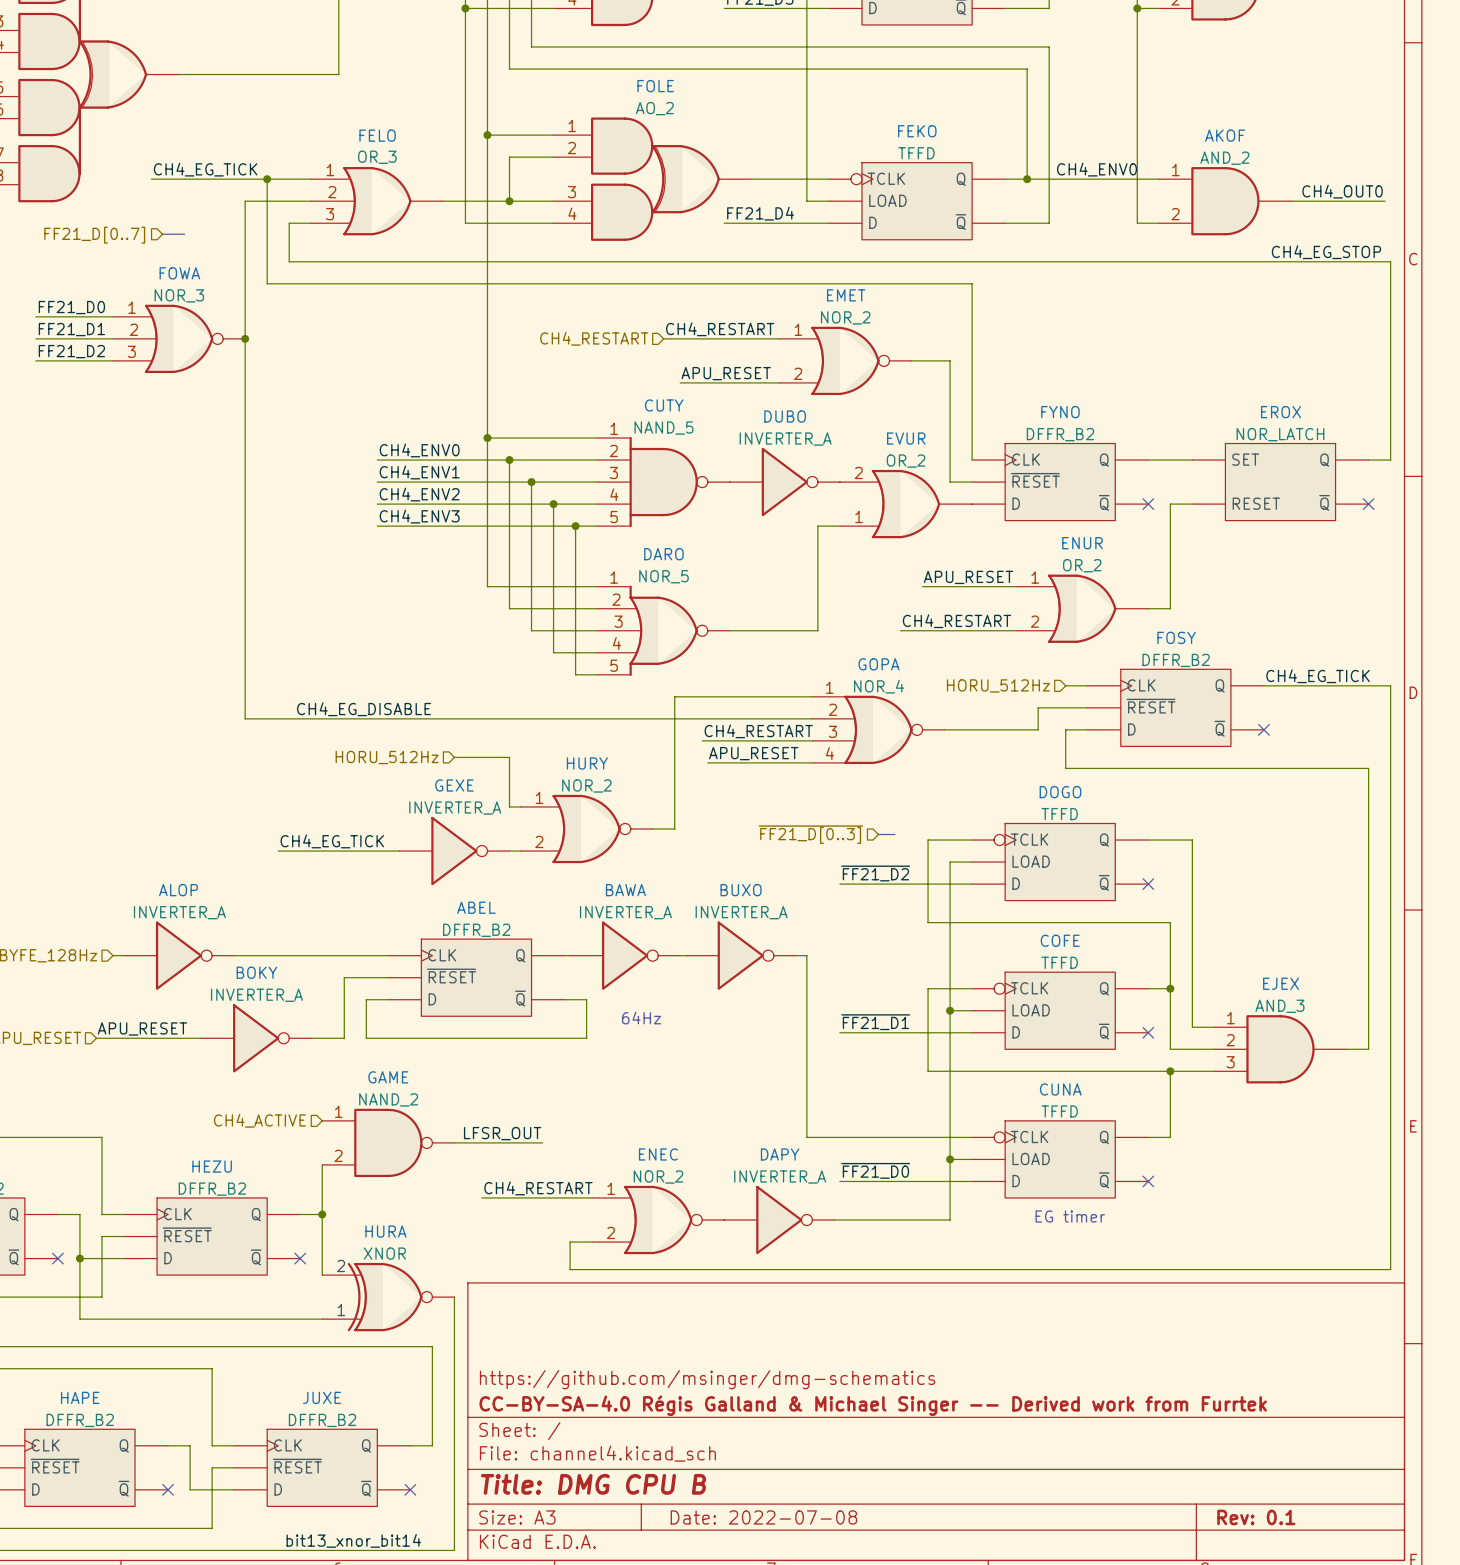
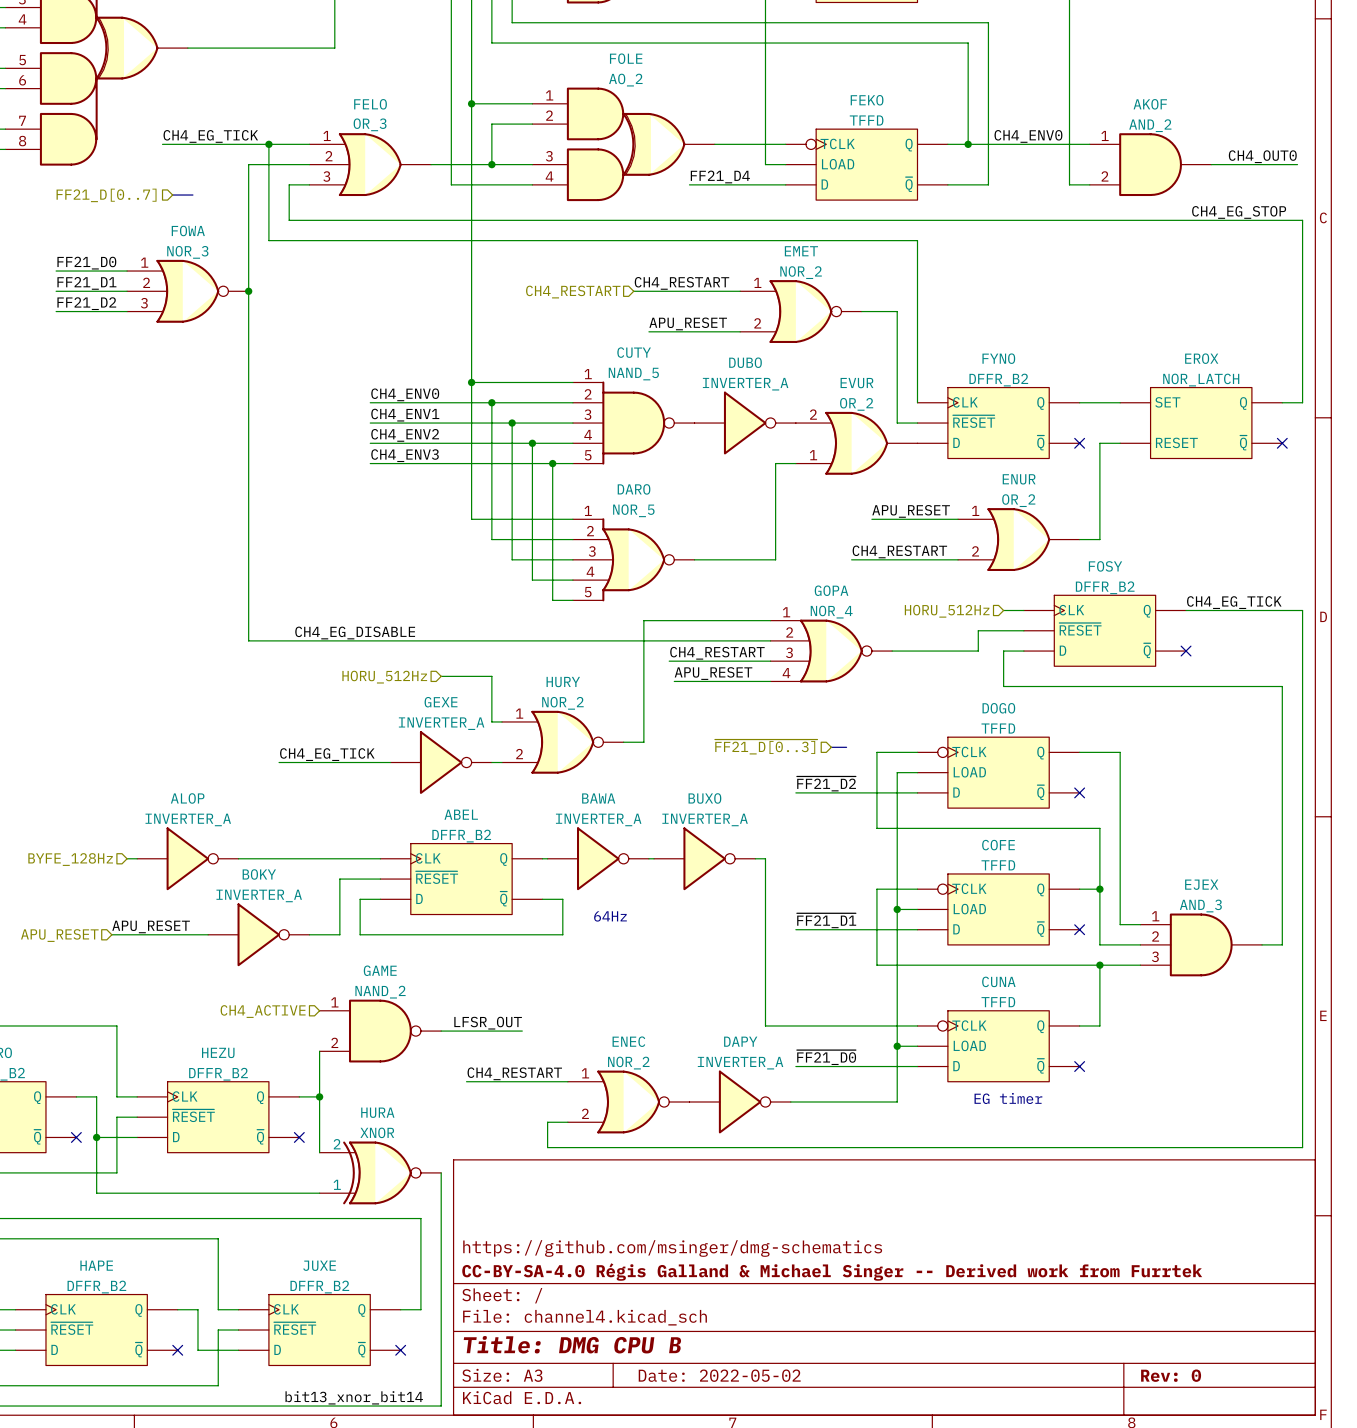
title block: Date: 2022-07-08 (763, 1517) -> Date: 2022-05-02 (719, 1375)
title block: Rev: 0.1 (1256, 1517) -> Rev: 0 (1171, 1375)

